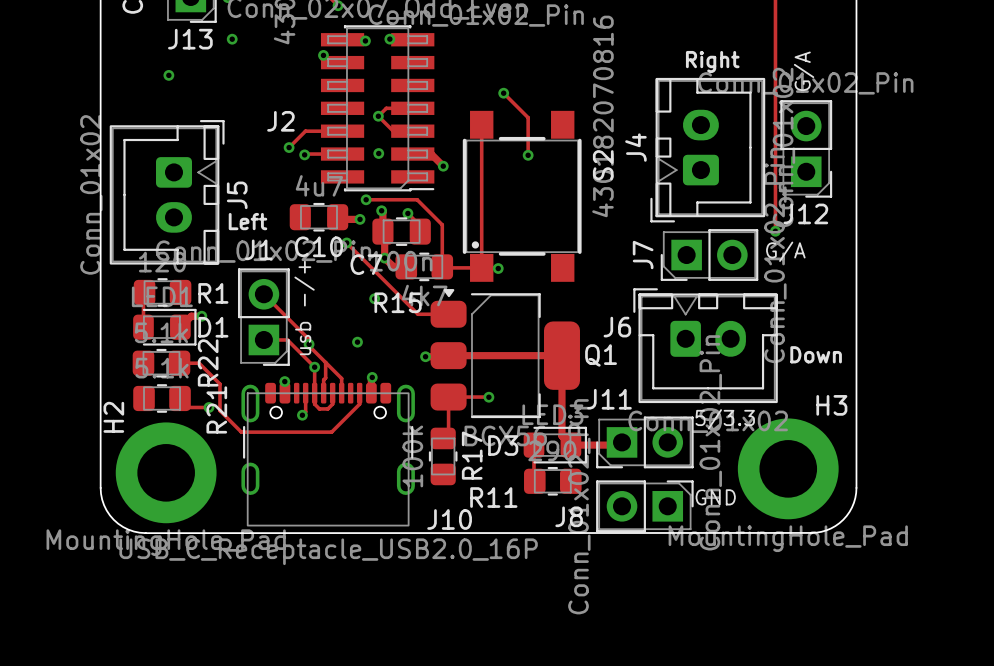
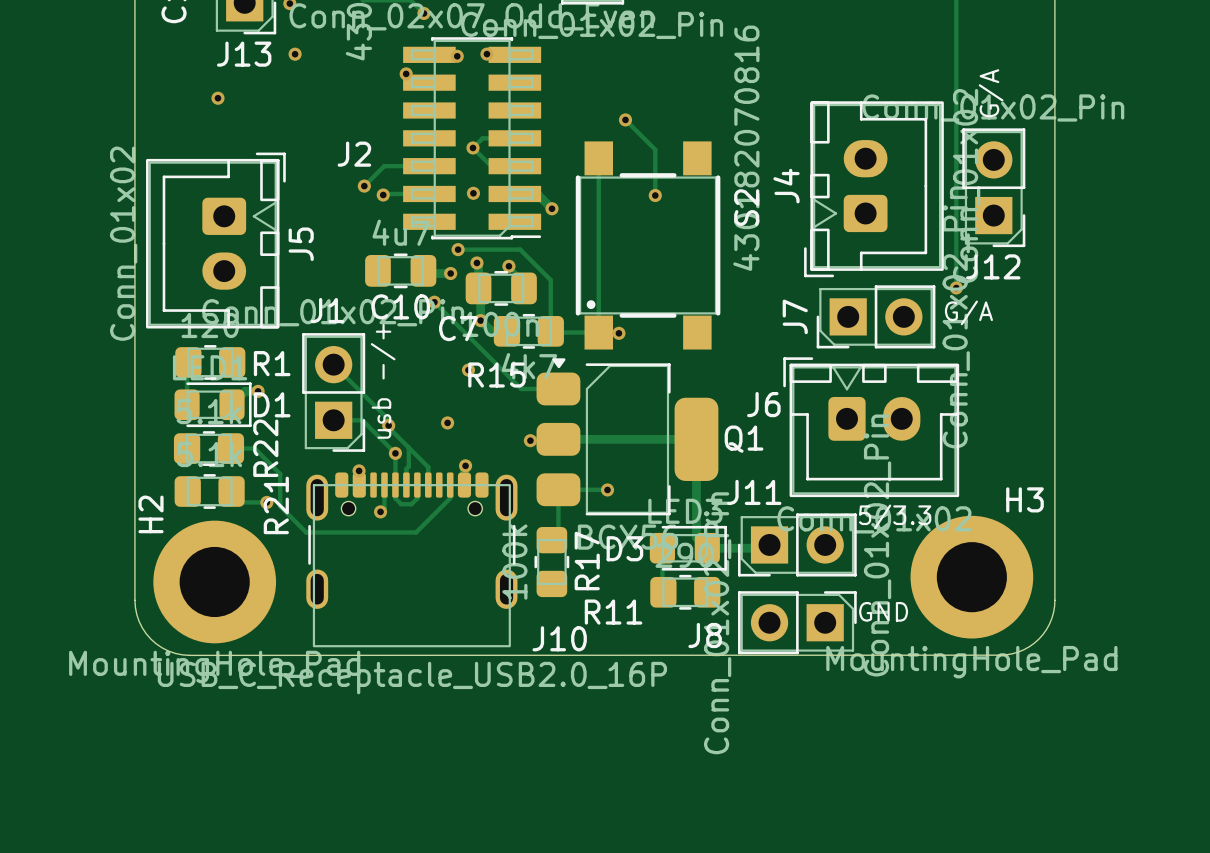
text: Right (712, 61) -> none
text: Left (247, 221) -> none
text: Down (816, 354) -> none

